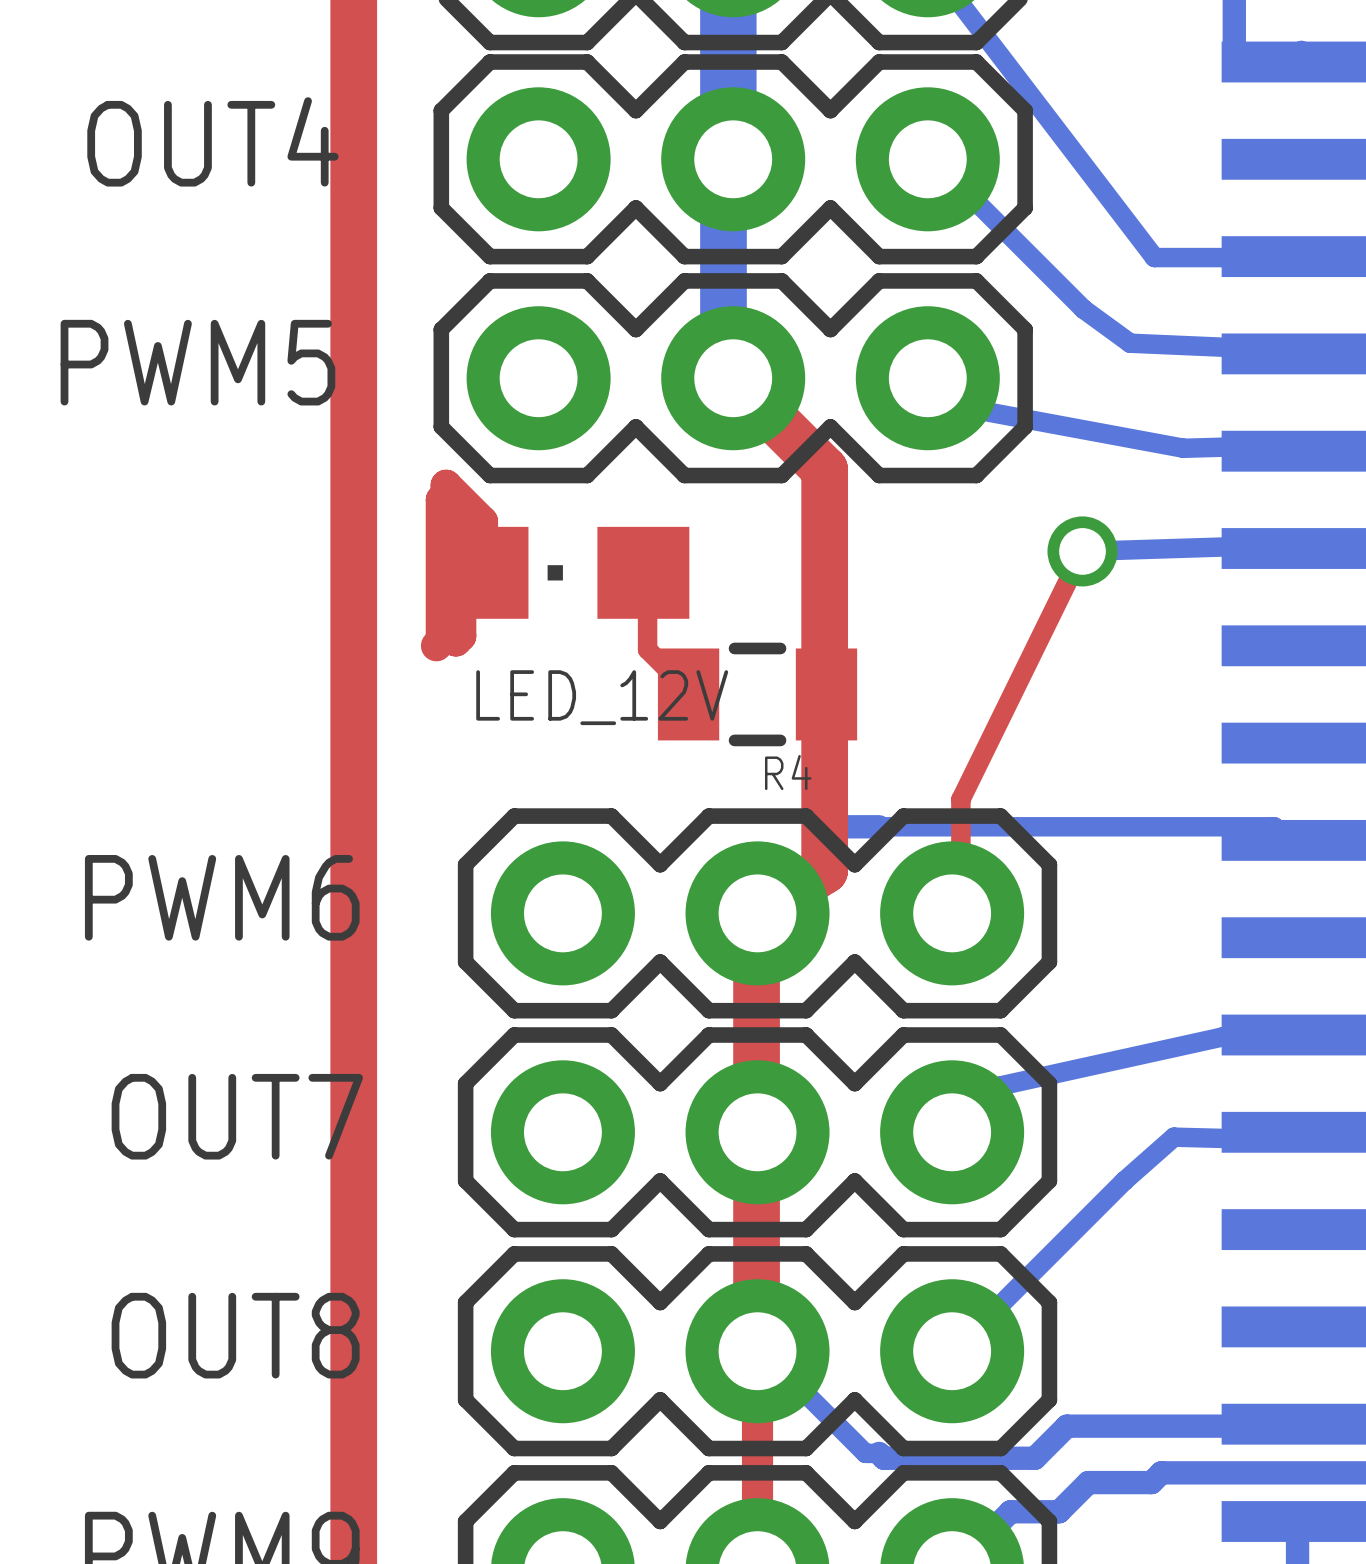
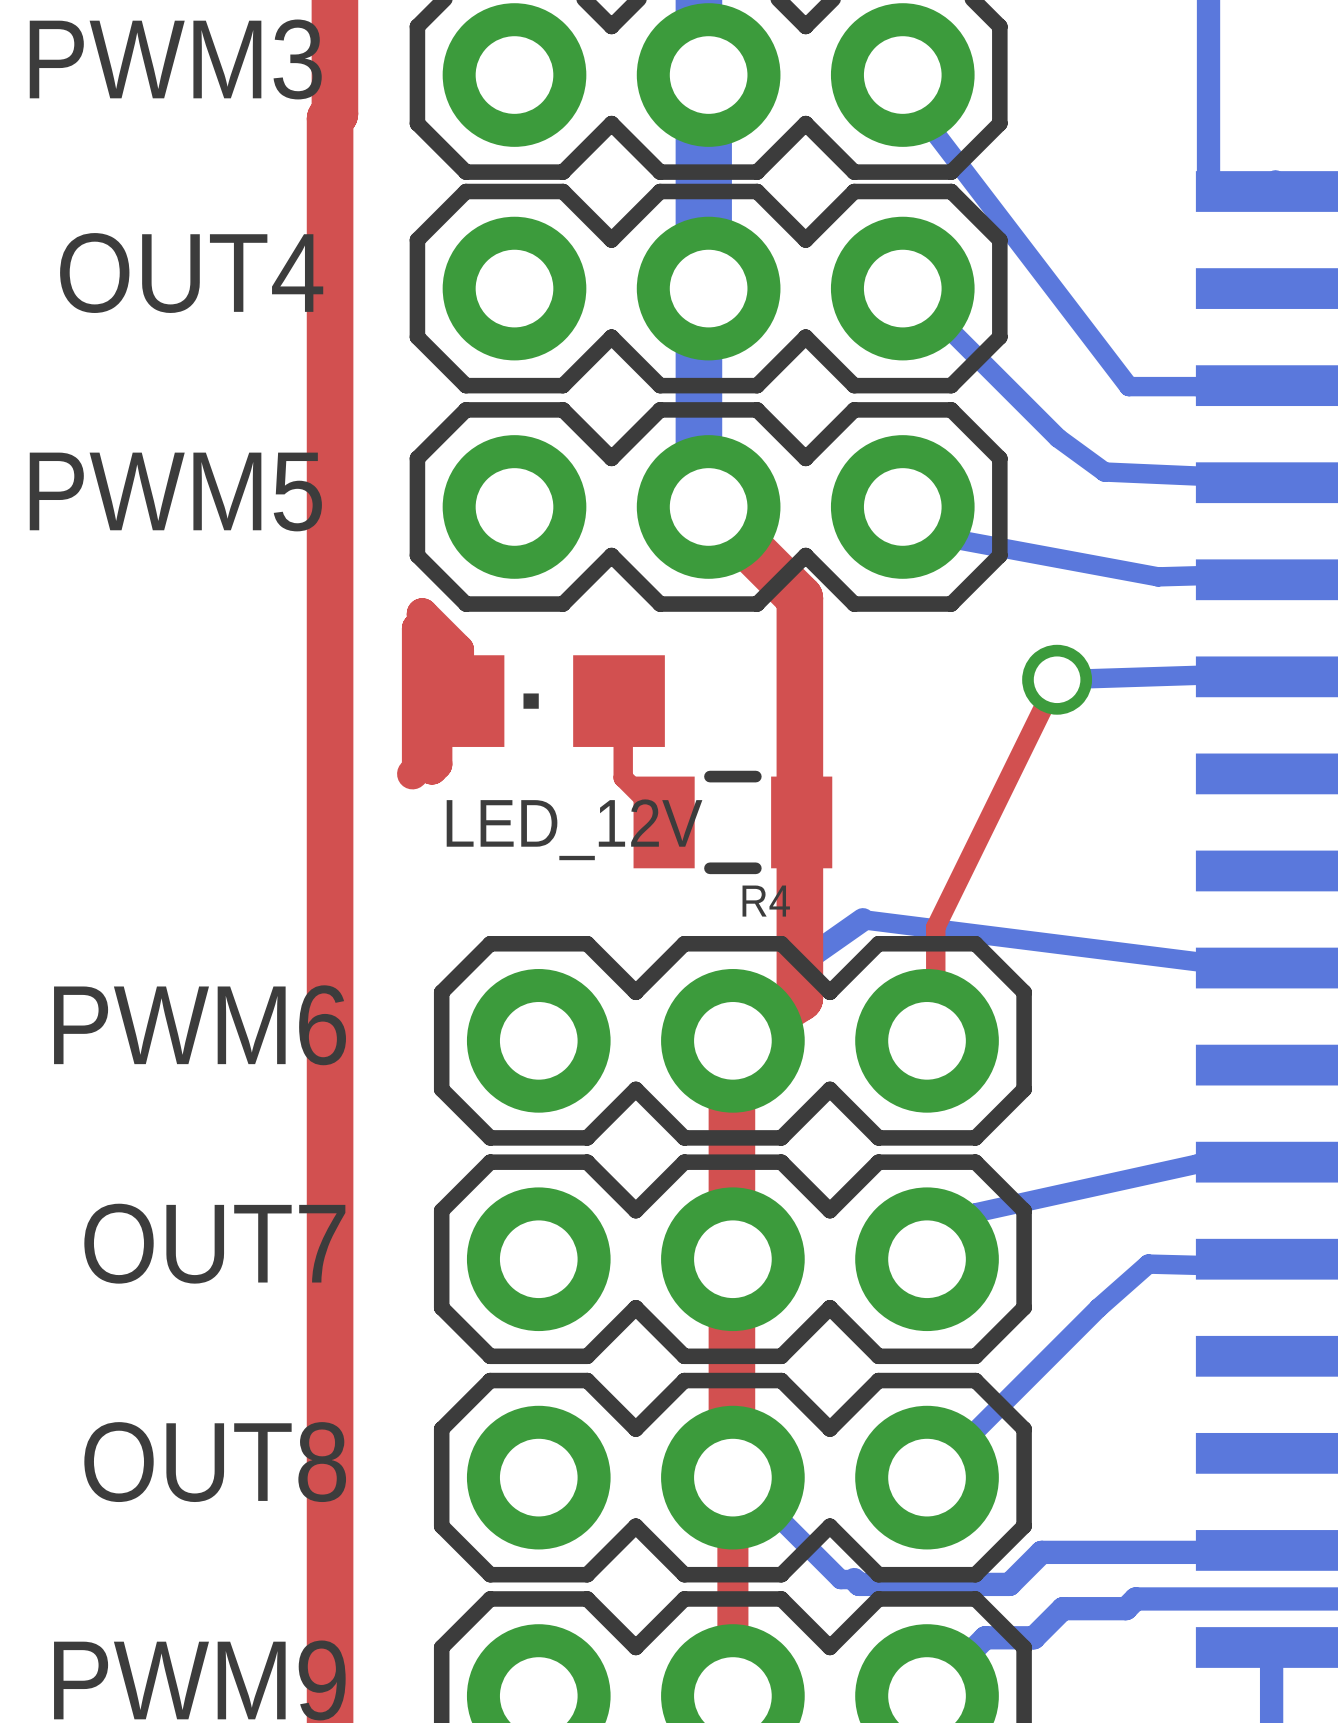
bottom track: (838, 826) (1274, 826) (1287, 840) -> (813, 954) (862, 919) (1230, 966) (1261, 968)

